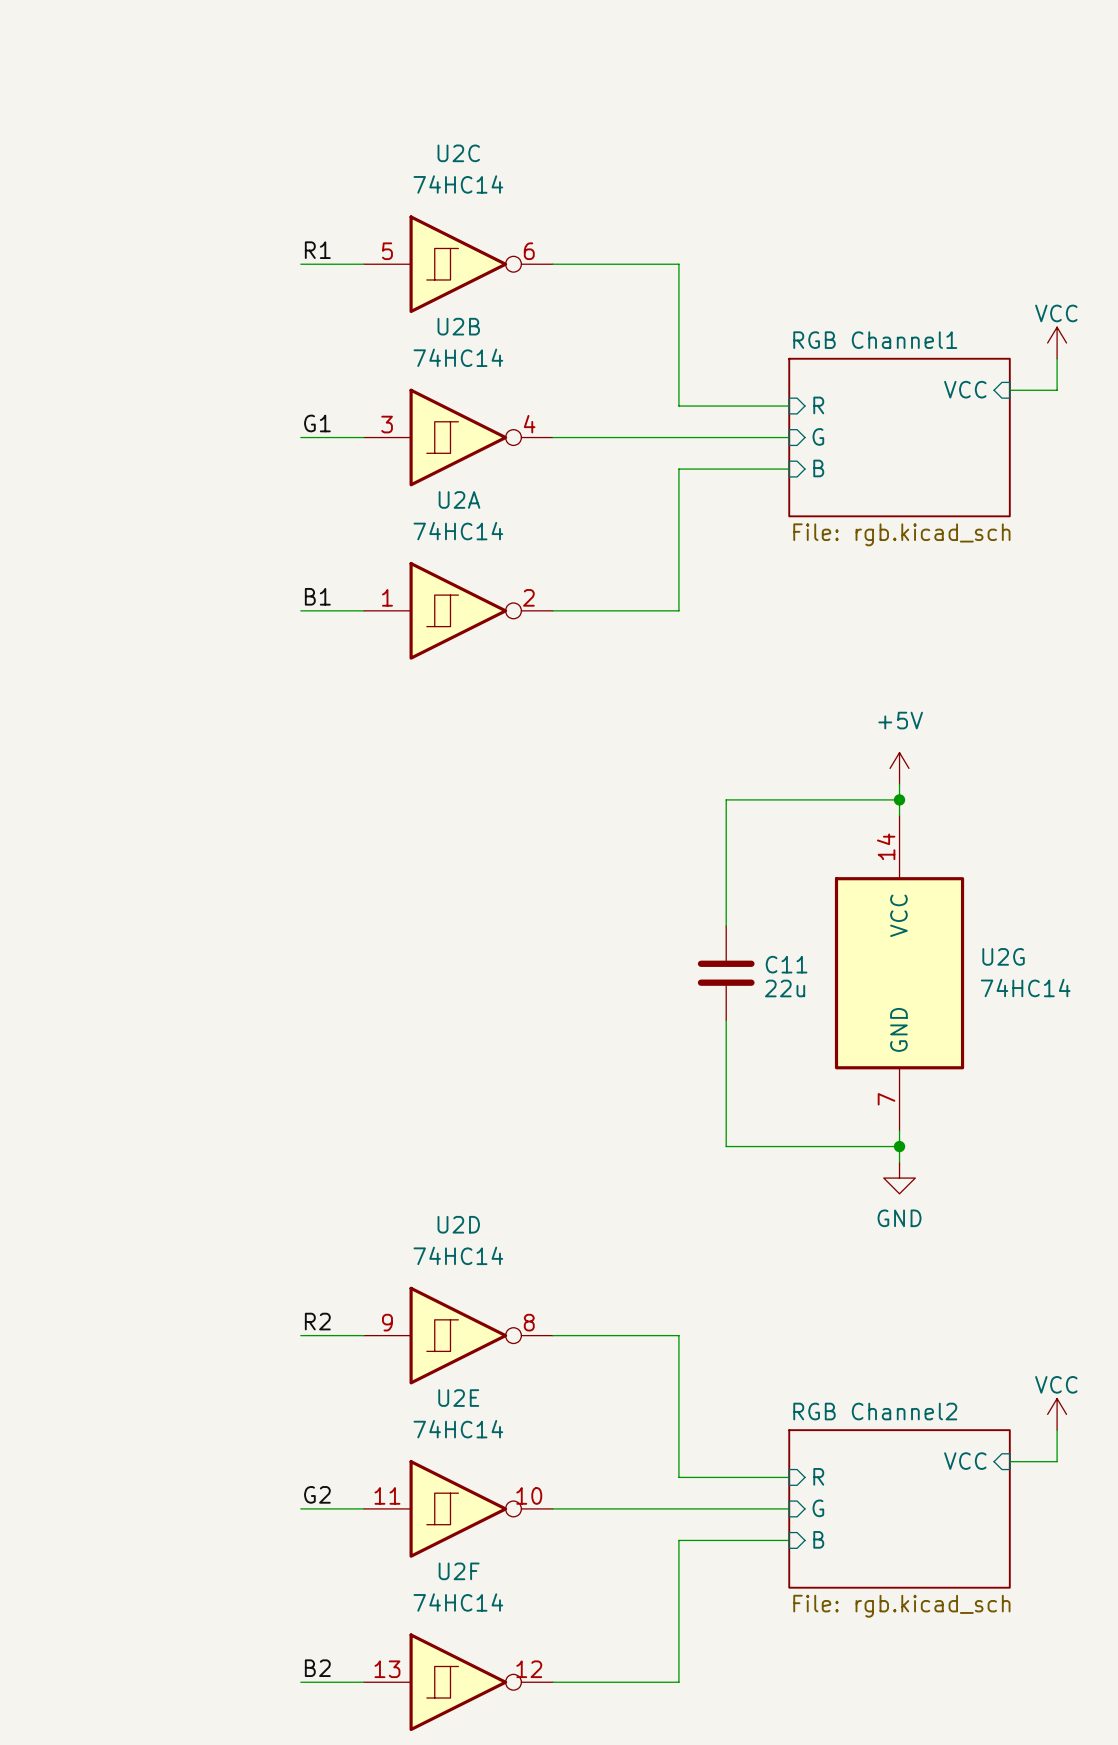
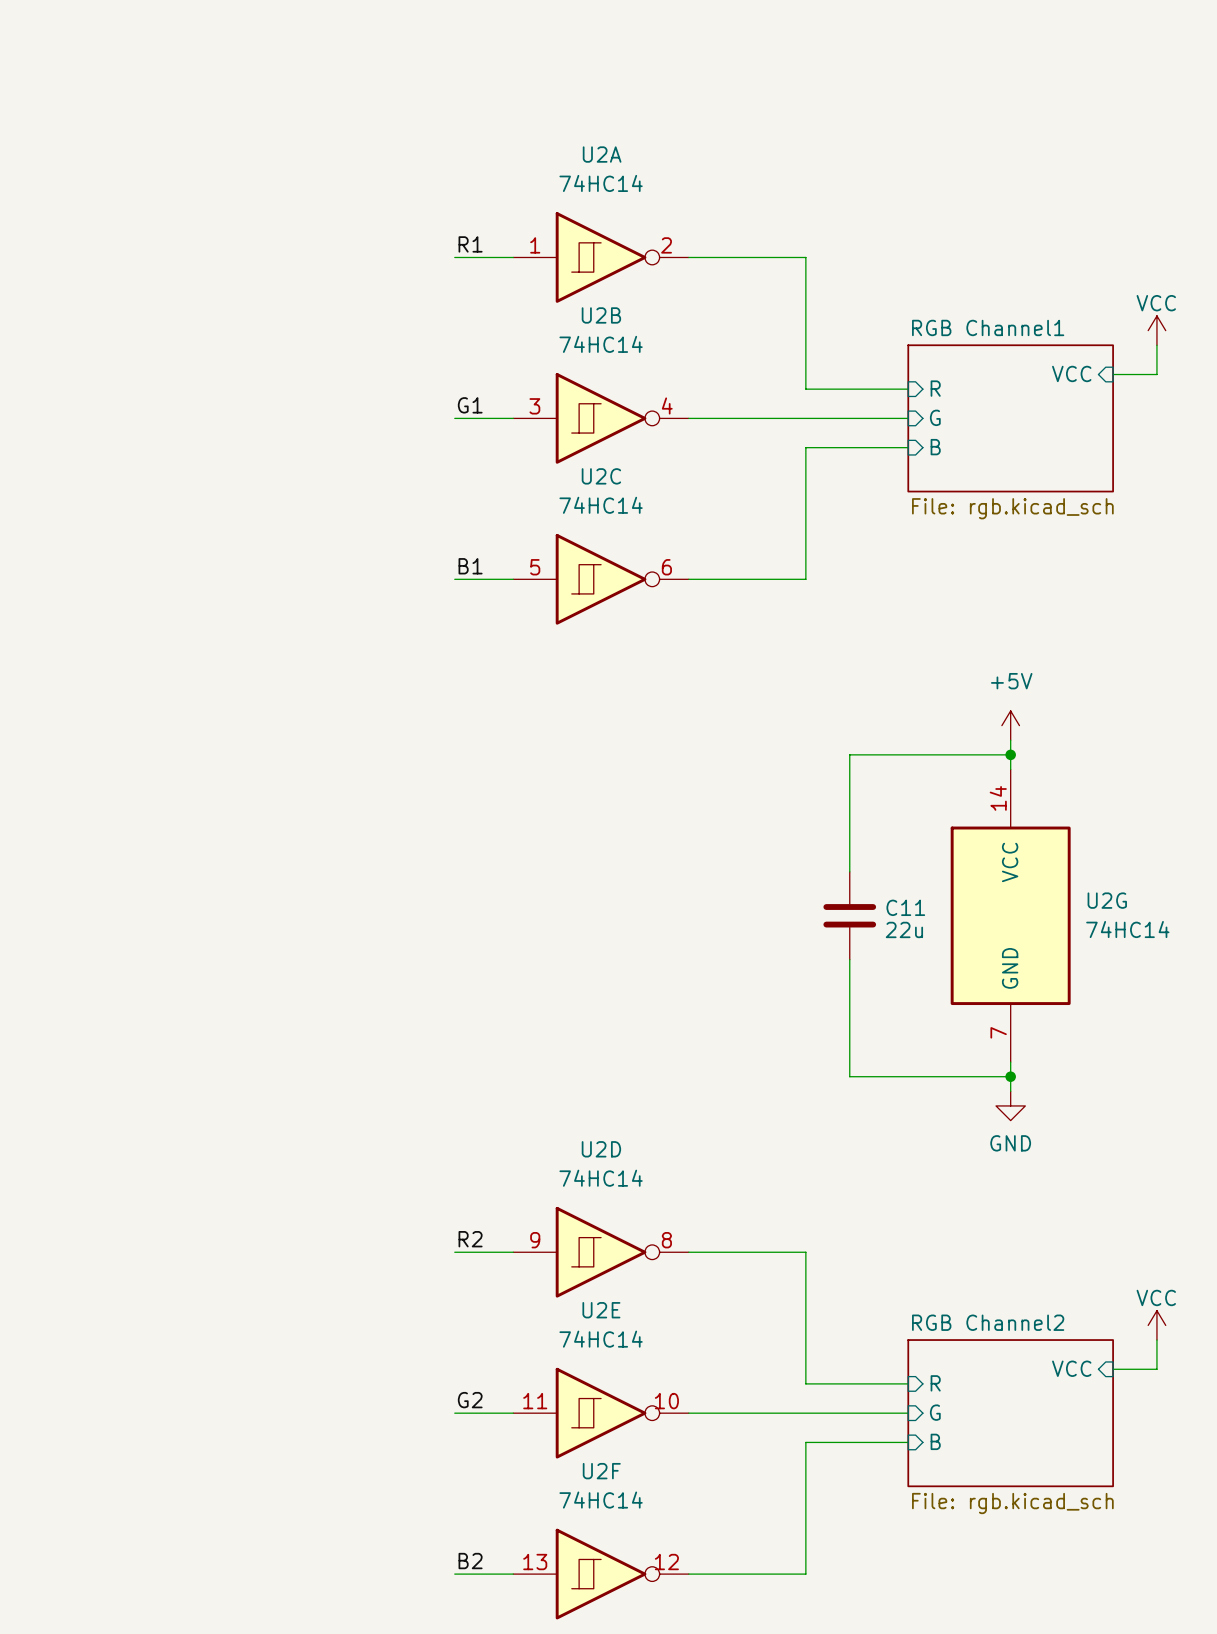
U2C position: (458, 264) -> (601, 579)
U2A position: (458, 610) -> (601, 257)

